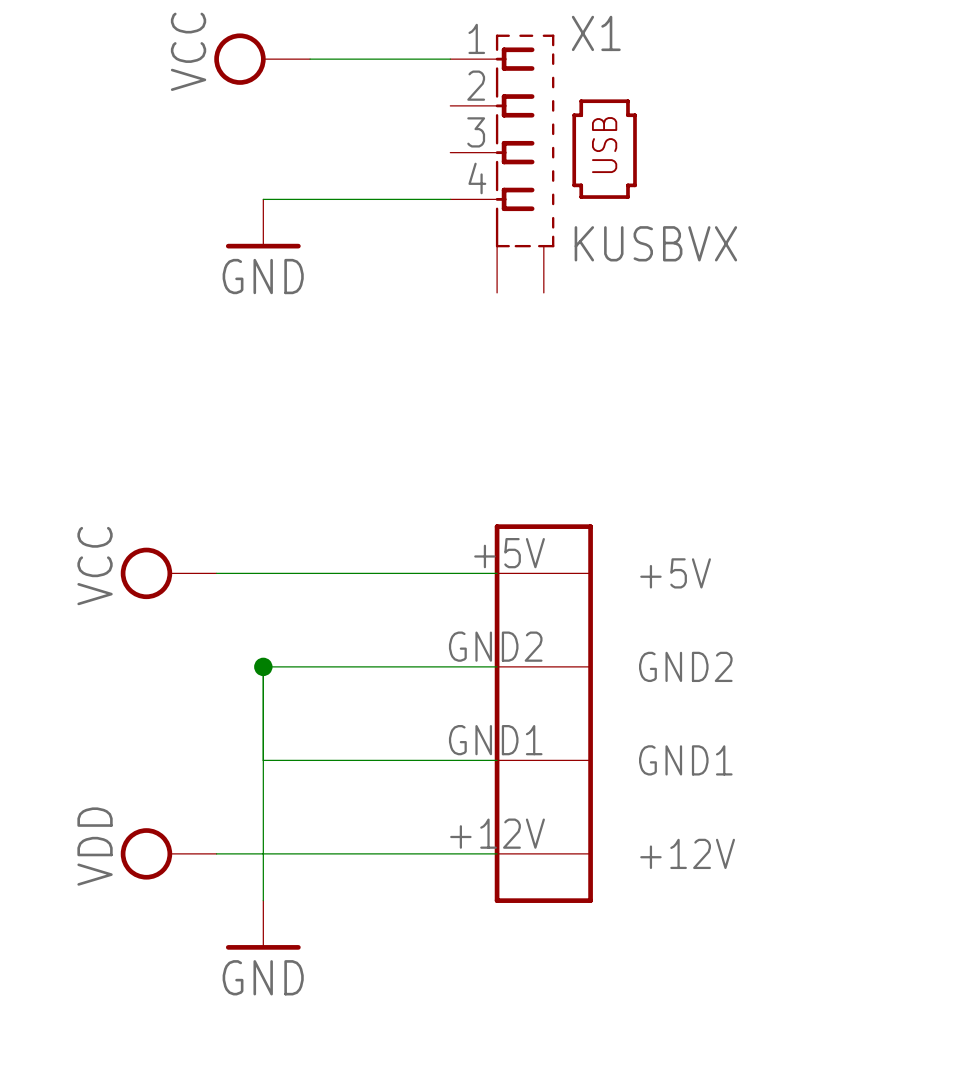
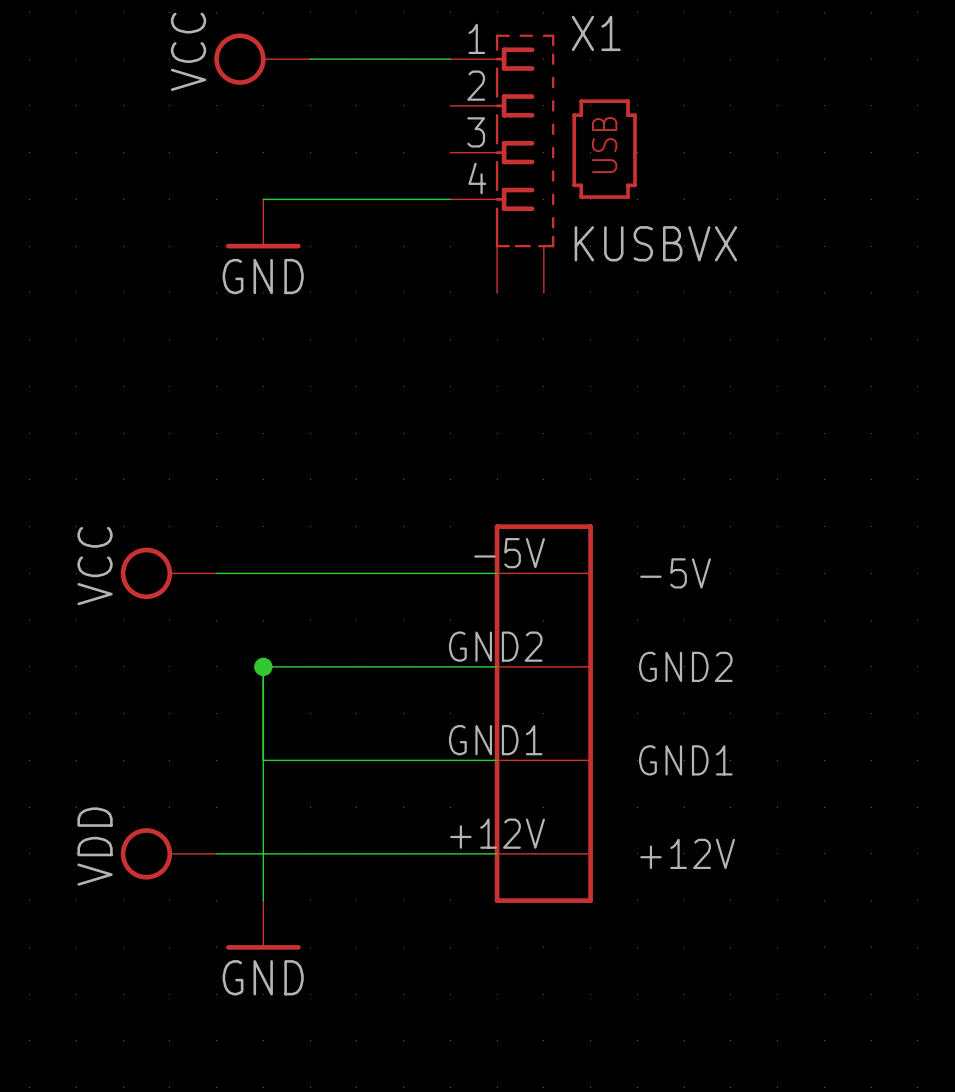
part pin number: +5V (509, 553) -> -5V (509, 553)
part pin name: +5V (675, 573) -> -5V (675, 573)

